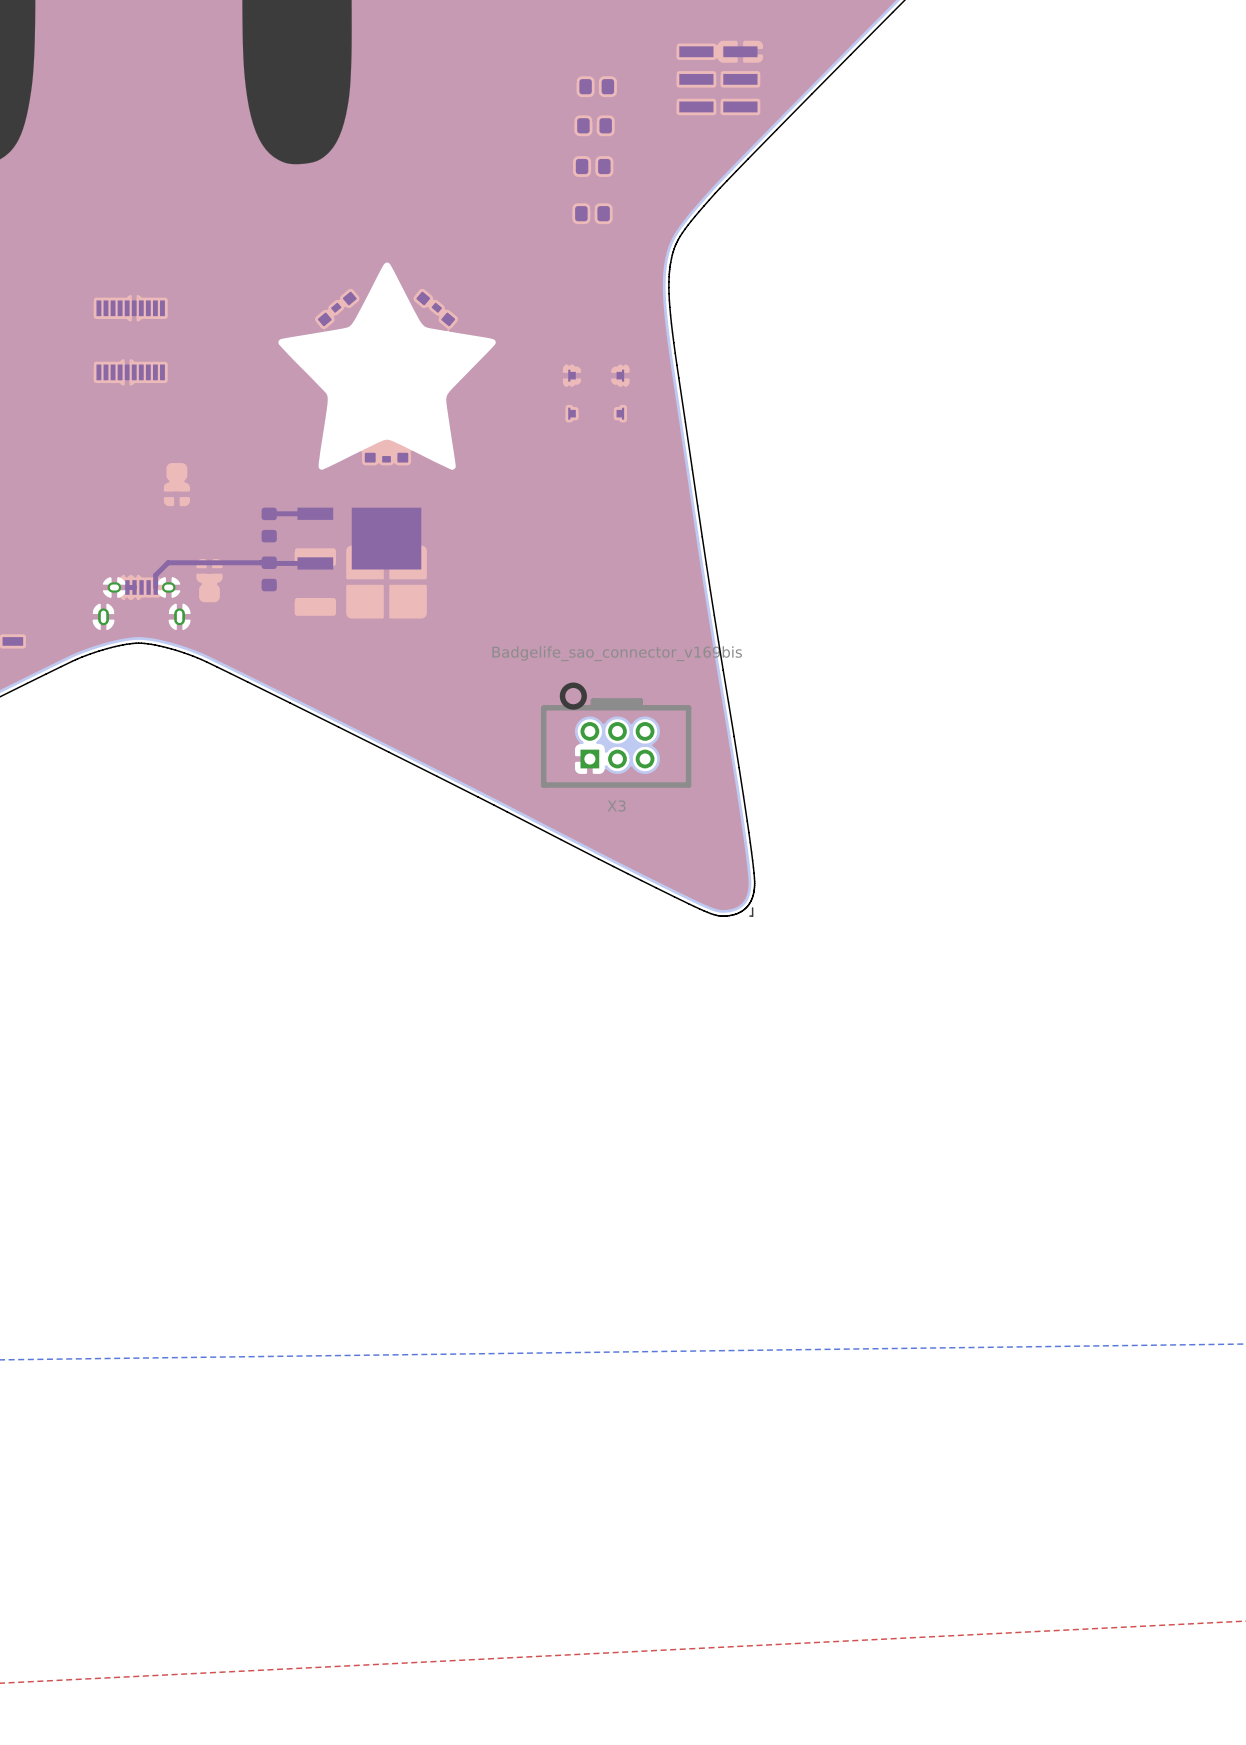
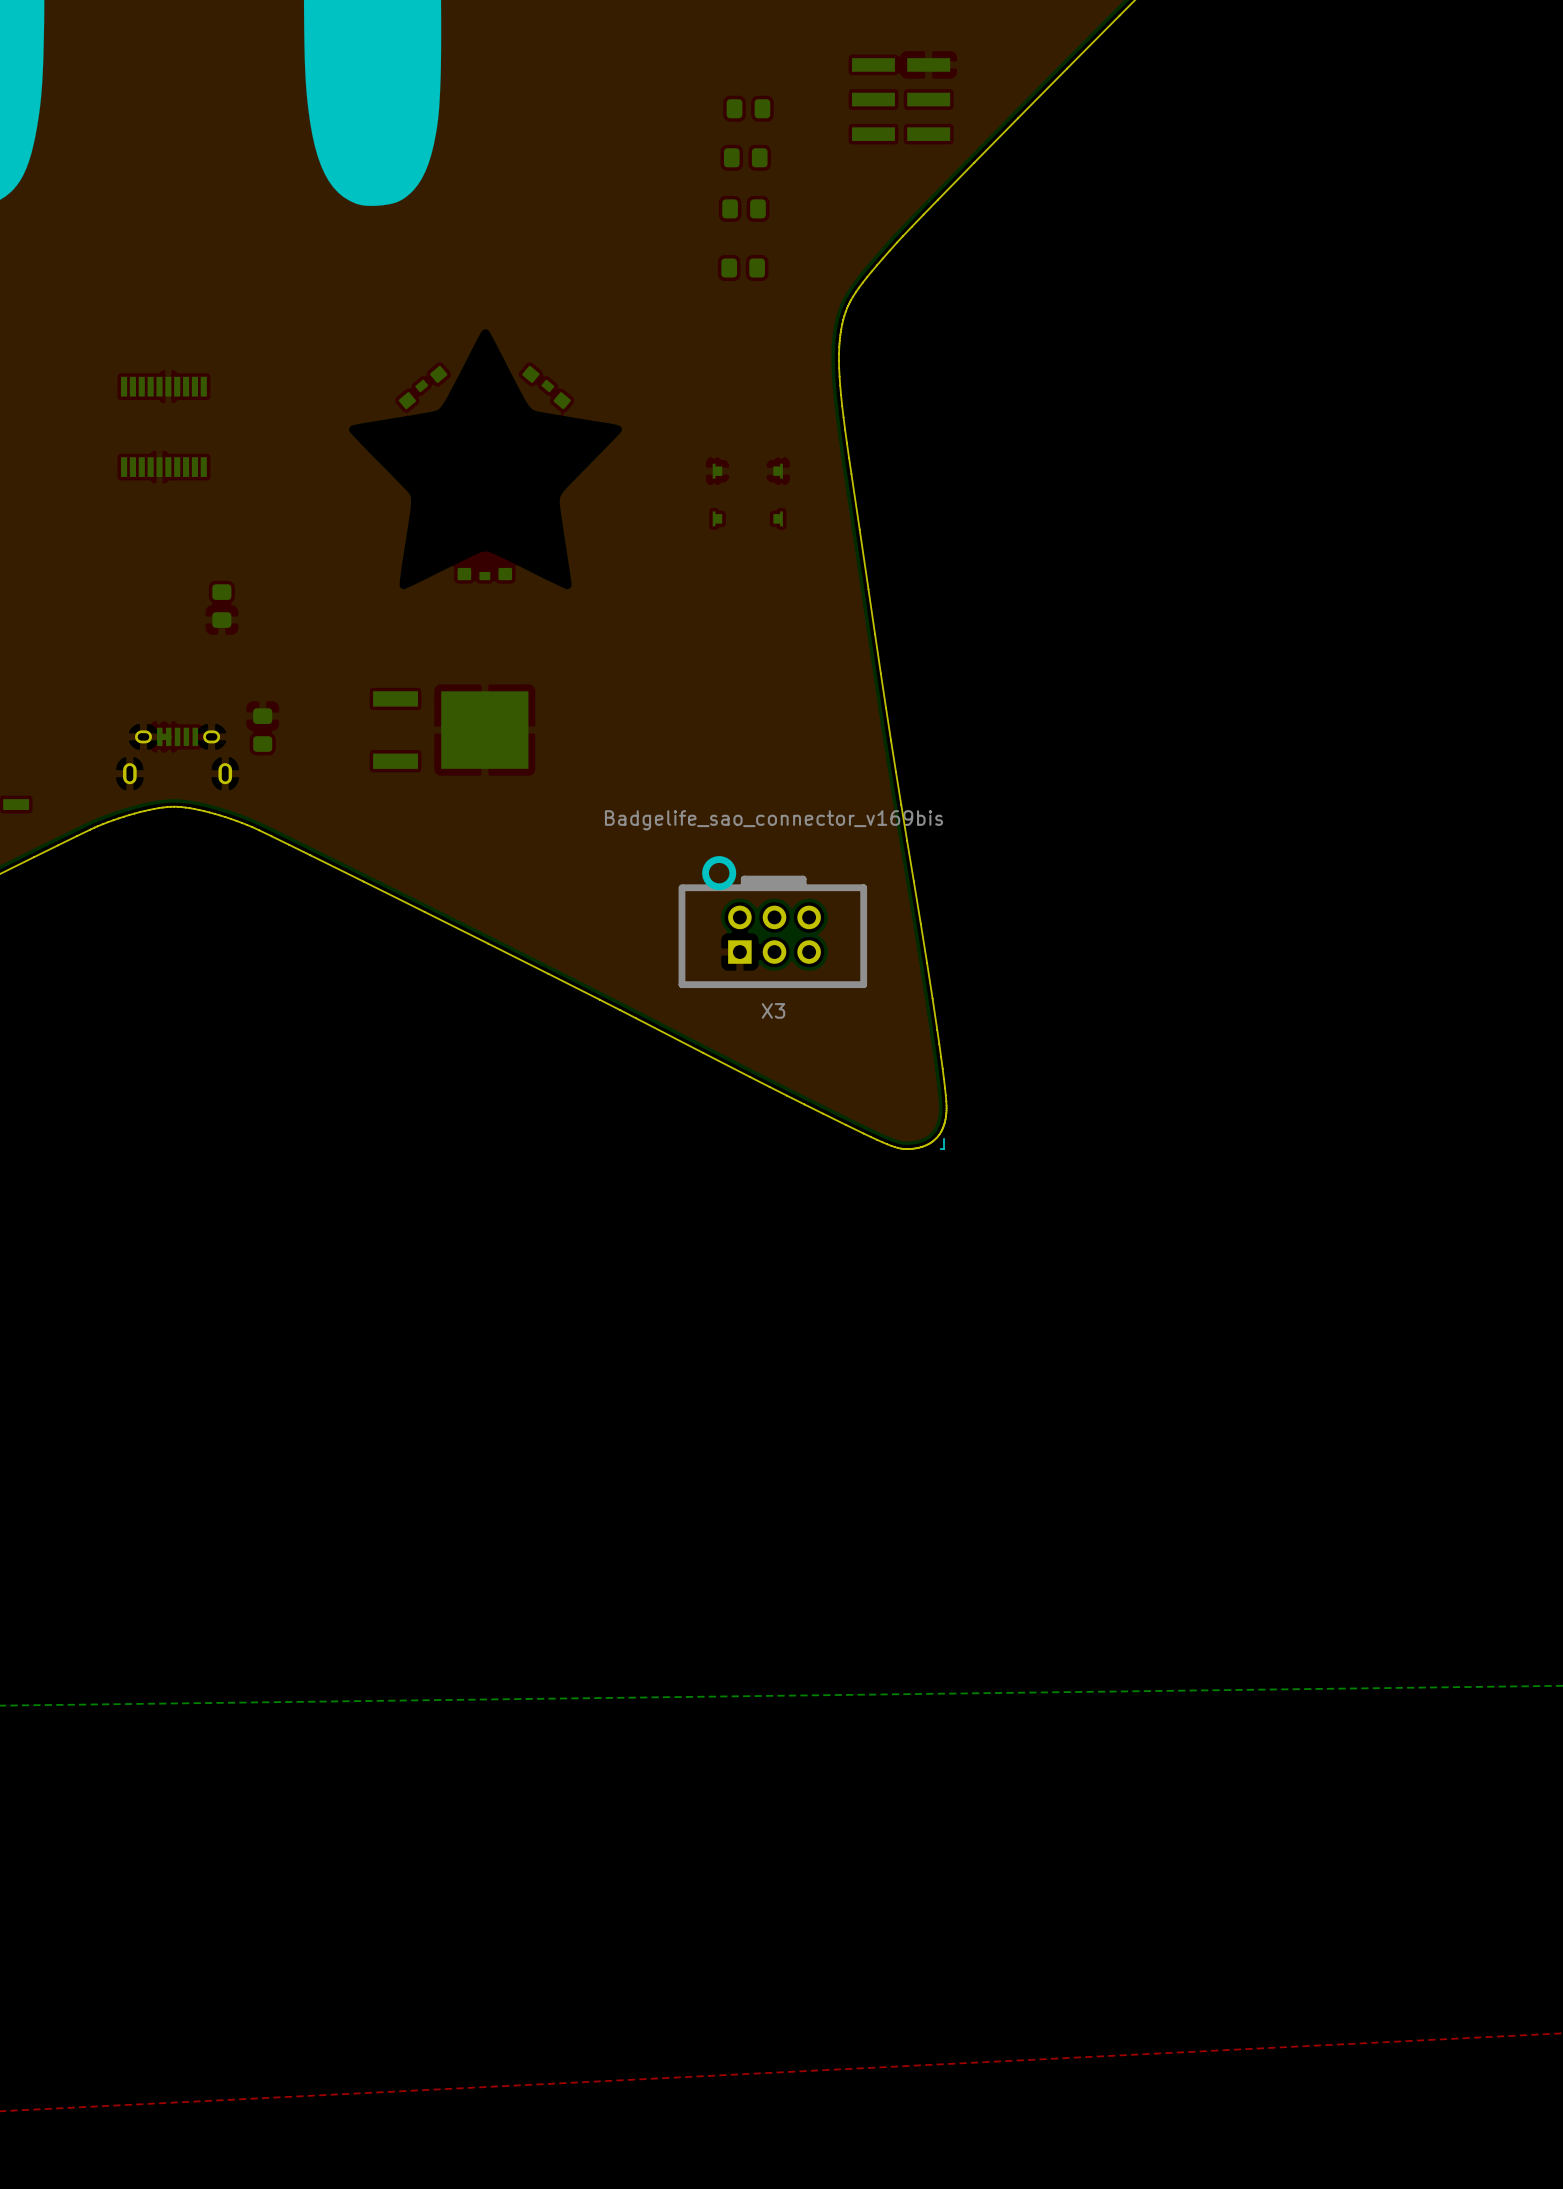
part: none -> (221, 606)
bottom track: (269, 513) (315, 513) -> none
part: (269, 525) -> none
part position: (359, 538) -> (450, 730)
bottom track: (269, 562) (168, 562) (155, 575) (155, 587) -> none
bottom track: (270, 562) (315, 563) -> none
part: (269, 573) -> none
part: none -> (262, 730)

